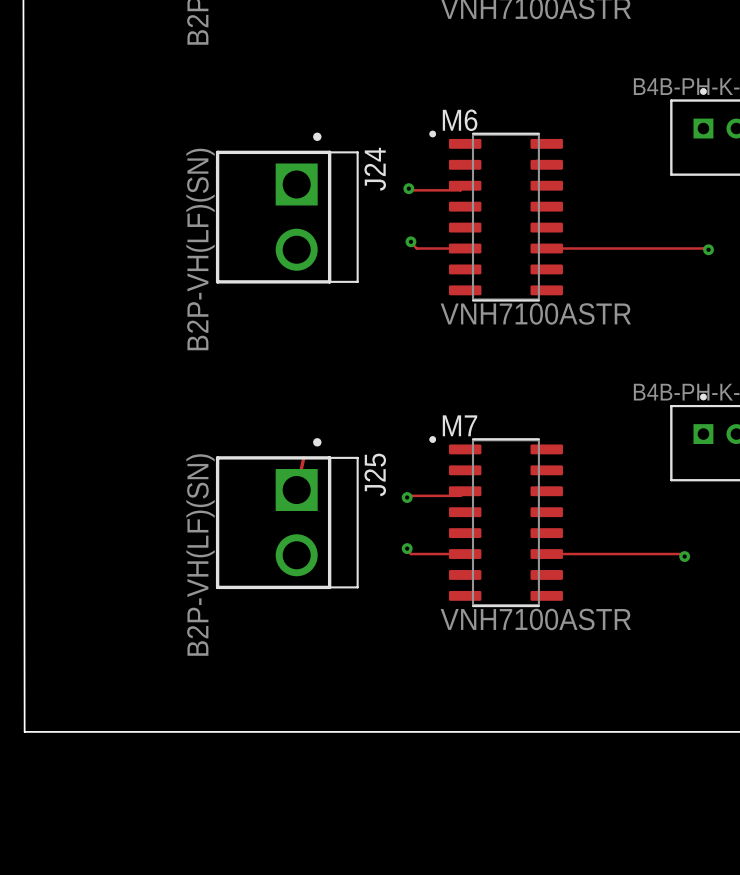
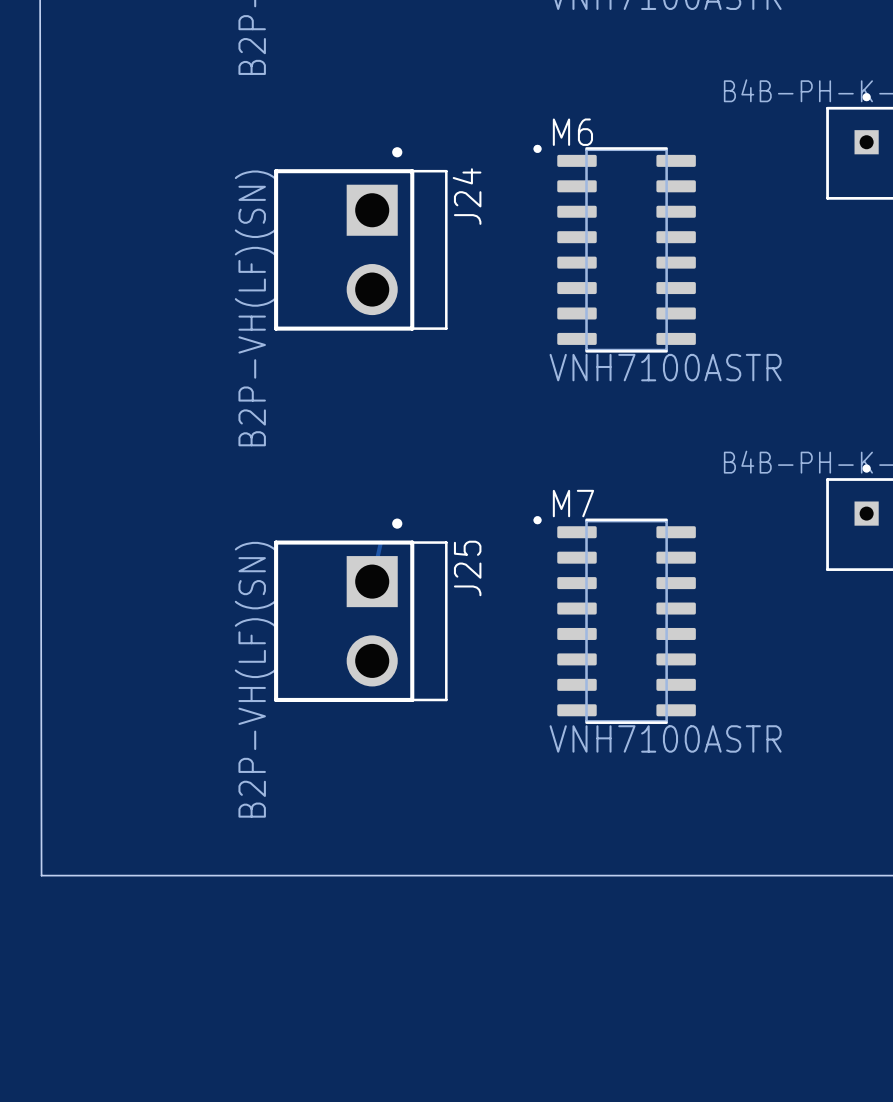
track: (465, 185) (460, 190) (409, 190) (408, 188) -> none
via: (408, 188) -> none
track: (410, 241) (416, 248) (465, 248) -> none
via: (410, 241) -> none
track: (546, 248) (703, 248) (706, 251) (708, 249) -> none
via: (708, 249) -> none
track: (465, 491) (460, 495) (407, 495) (407, 497) -> none
via: (407, 497) -> none
track: (407, 548) (410, 554) (465, 554) -> none
via: (407, 548) -> none
track: (546, 554) (684, 554) (684, 556) -> none
via: (684, 556) -> none

